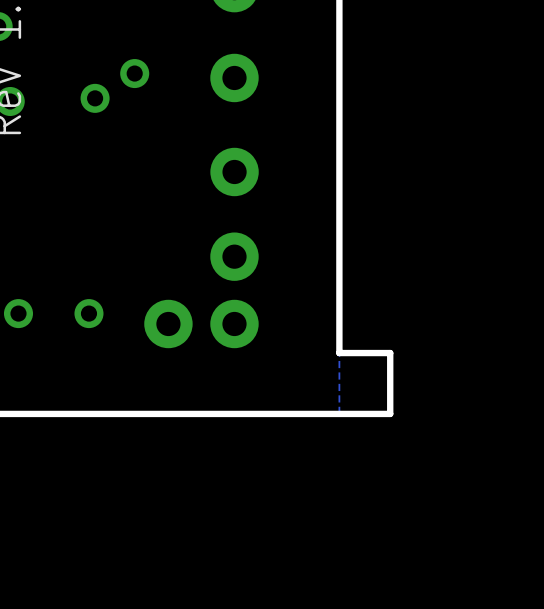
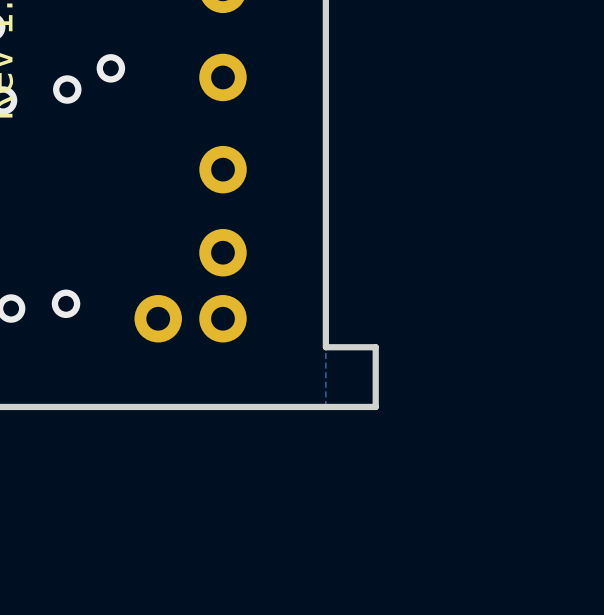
via position: (134, 73) -> (110, 68)
via position: (95, 98) -> (67, 89)
via position: (88, 313) -> (66, 303)

